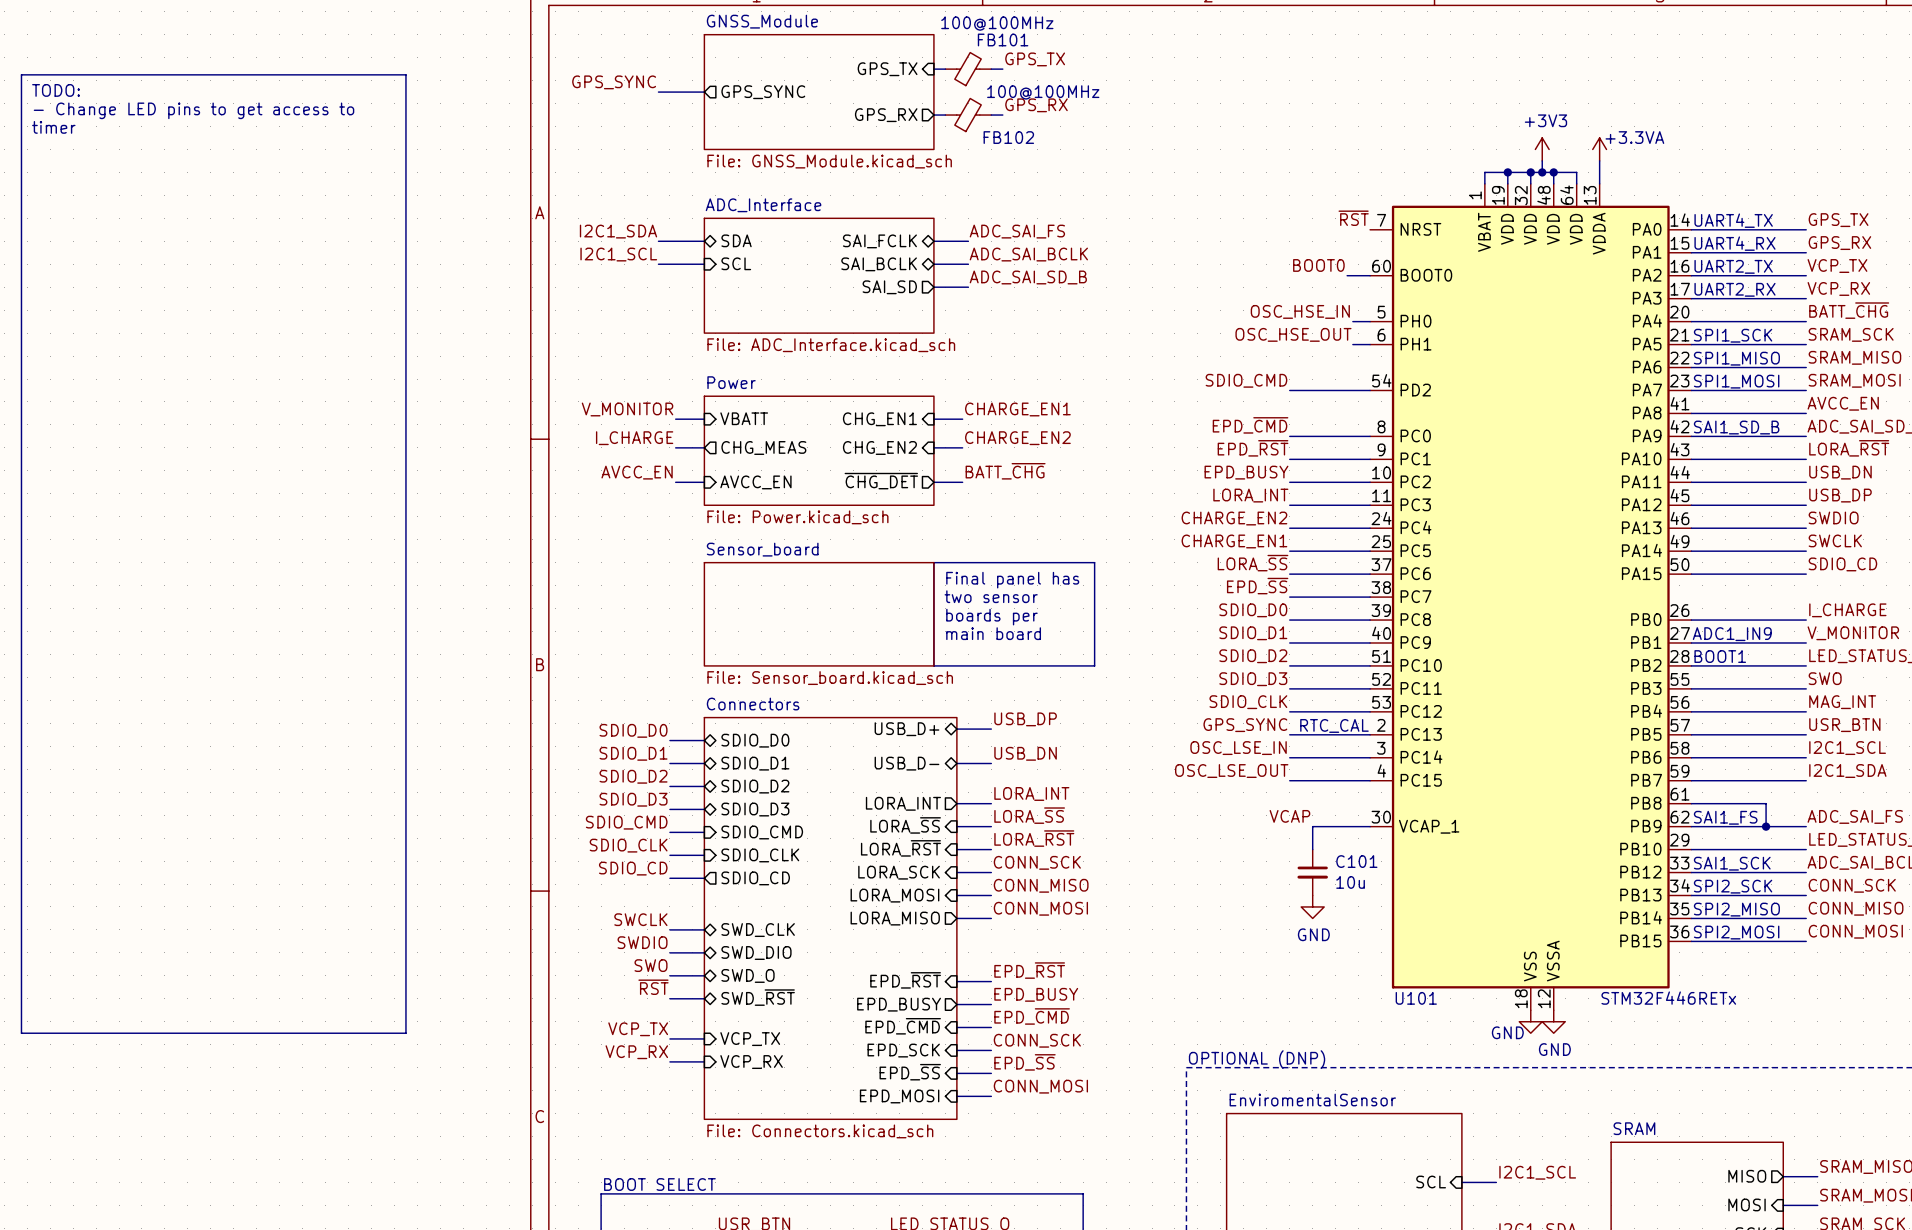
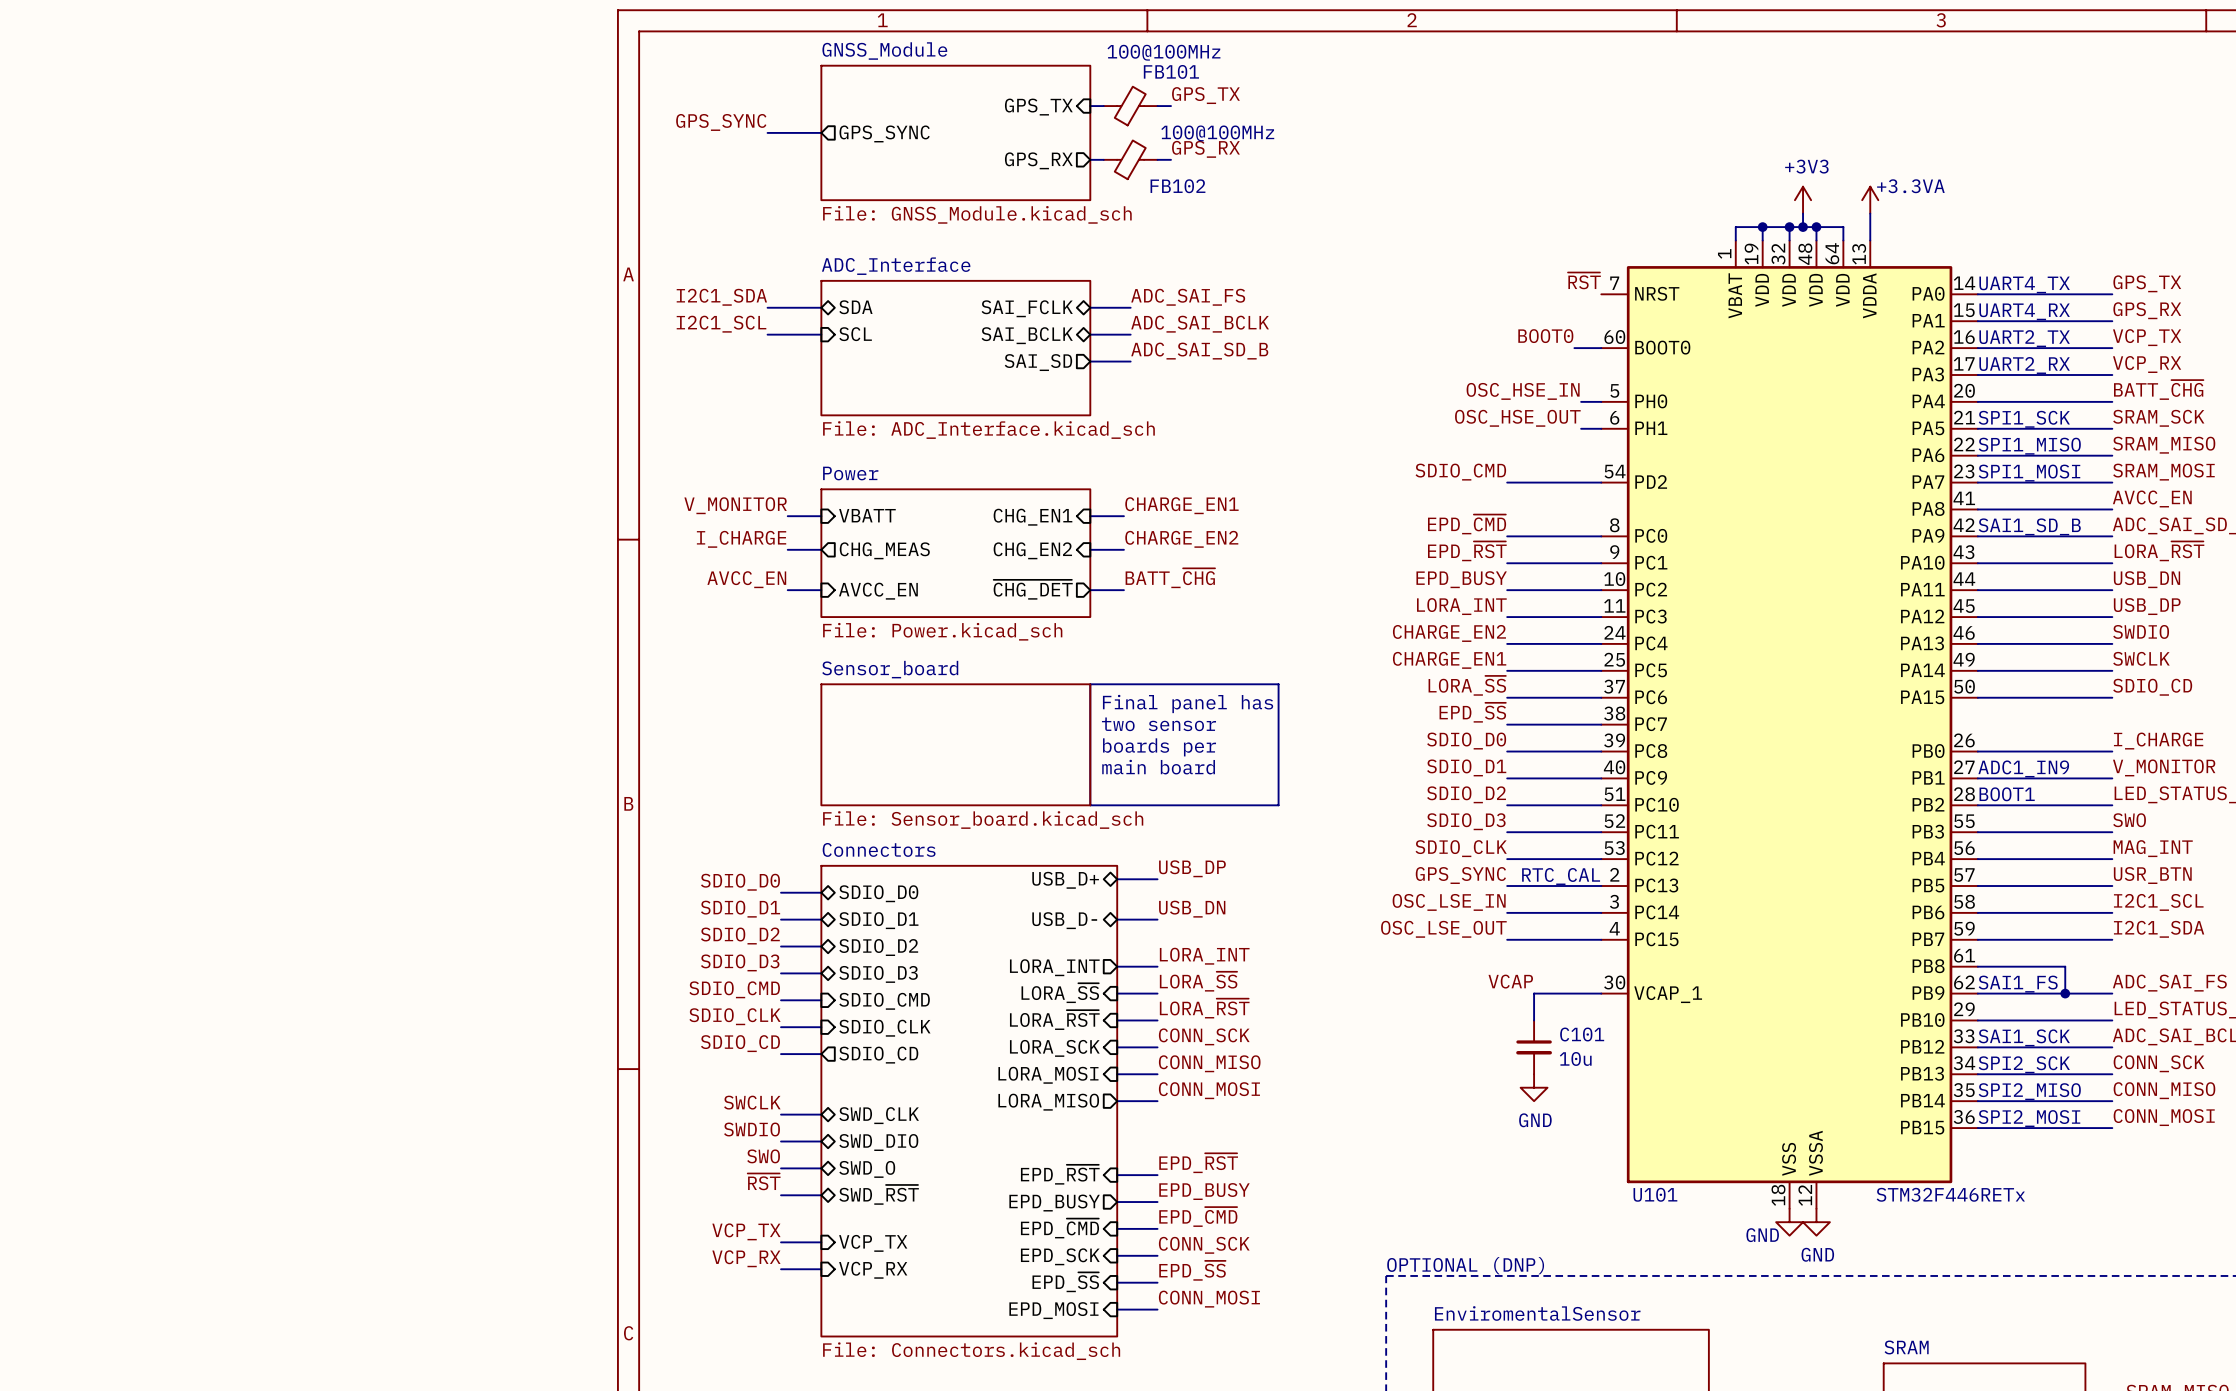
line: (21, 74) (405, 74) (405, 1033) (21, 1033) (21, 74) -> none
text: TODO: (56, 90) -> none
text: - Change LED pins to get access to (194, 110) -> none
text: timer (53, 127) -> none

